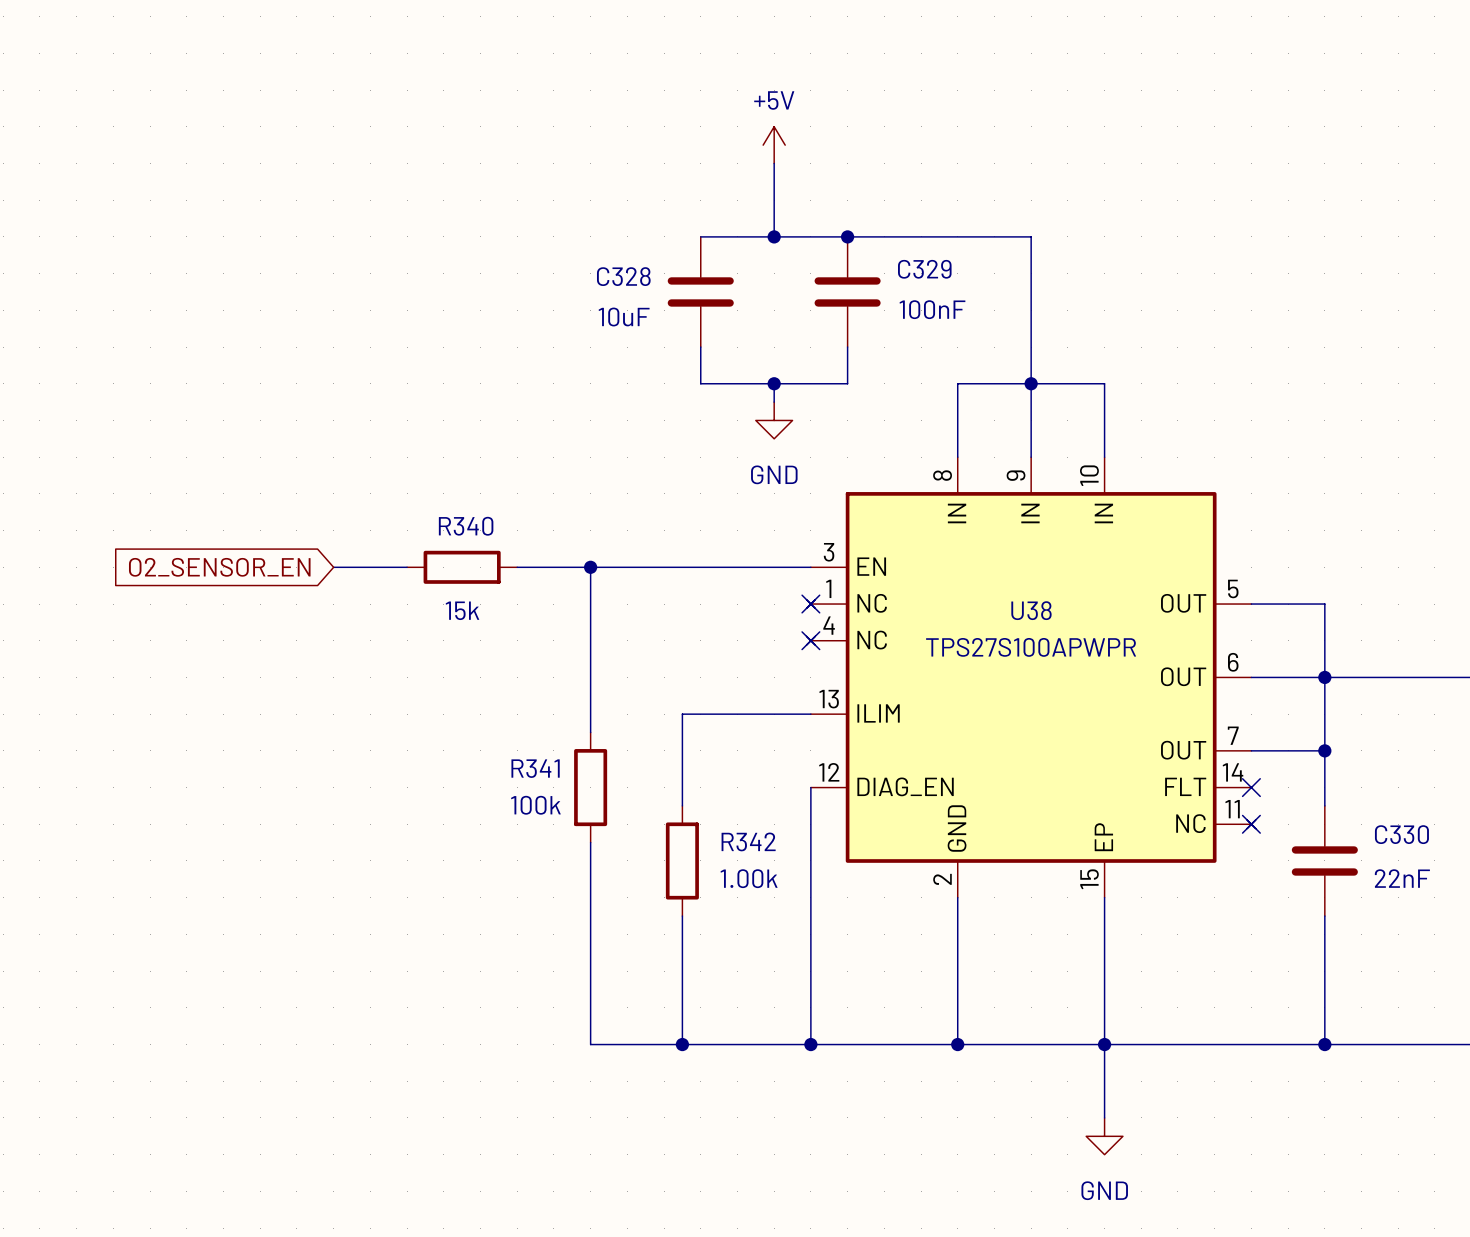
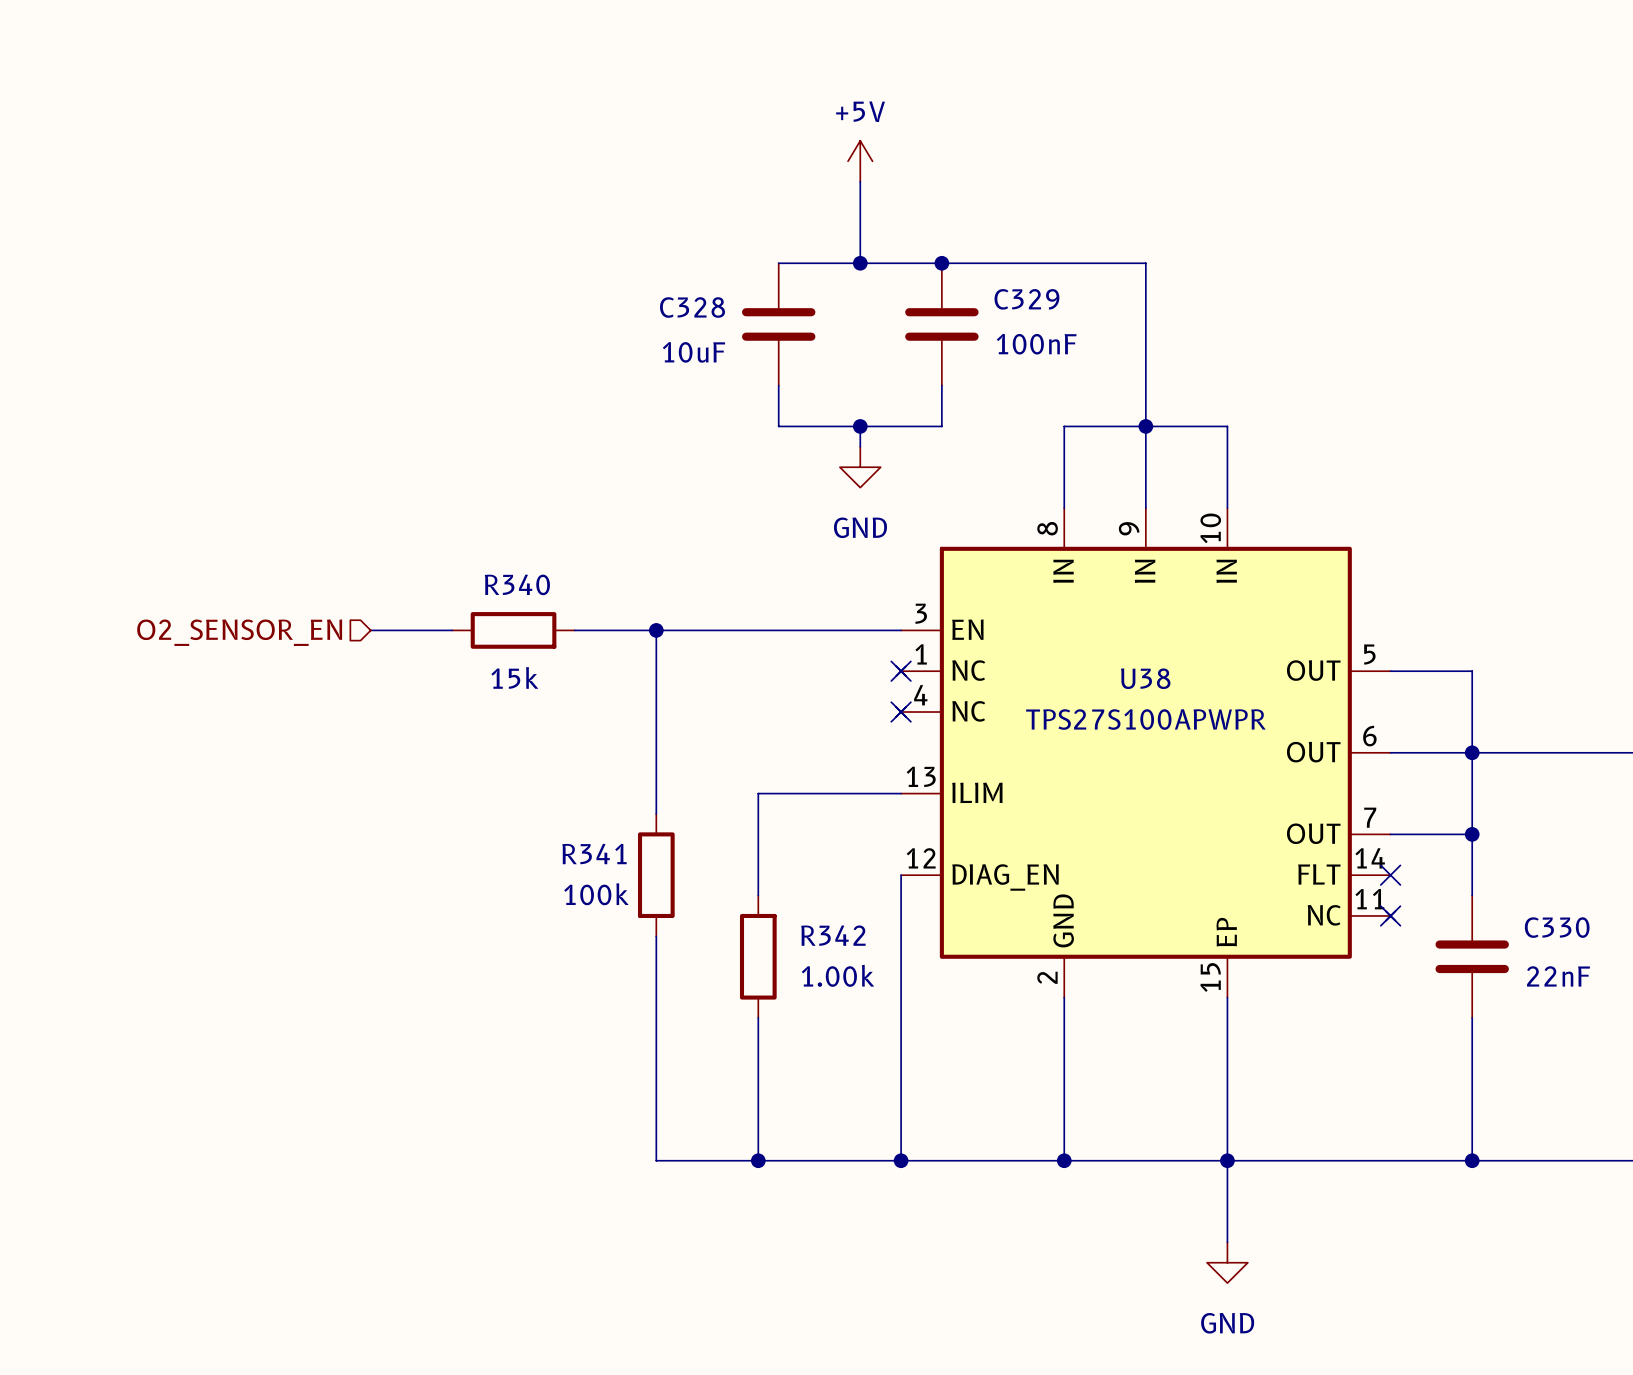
hierarchical label: none -> O2_SENSOR_EN (239, 632)
global label: O2_SENSOR_EN (219, 567) -> none

